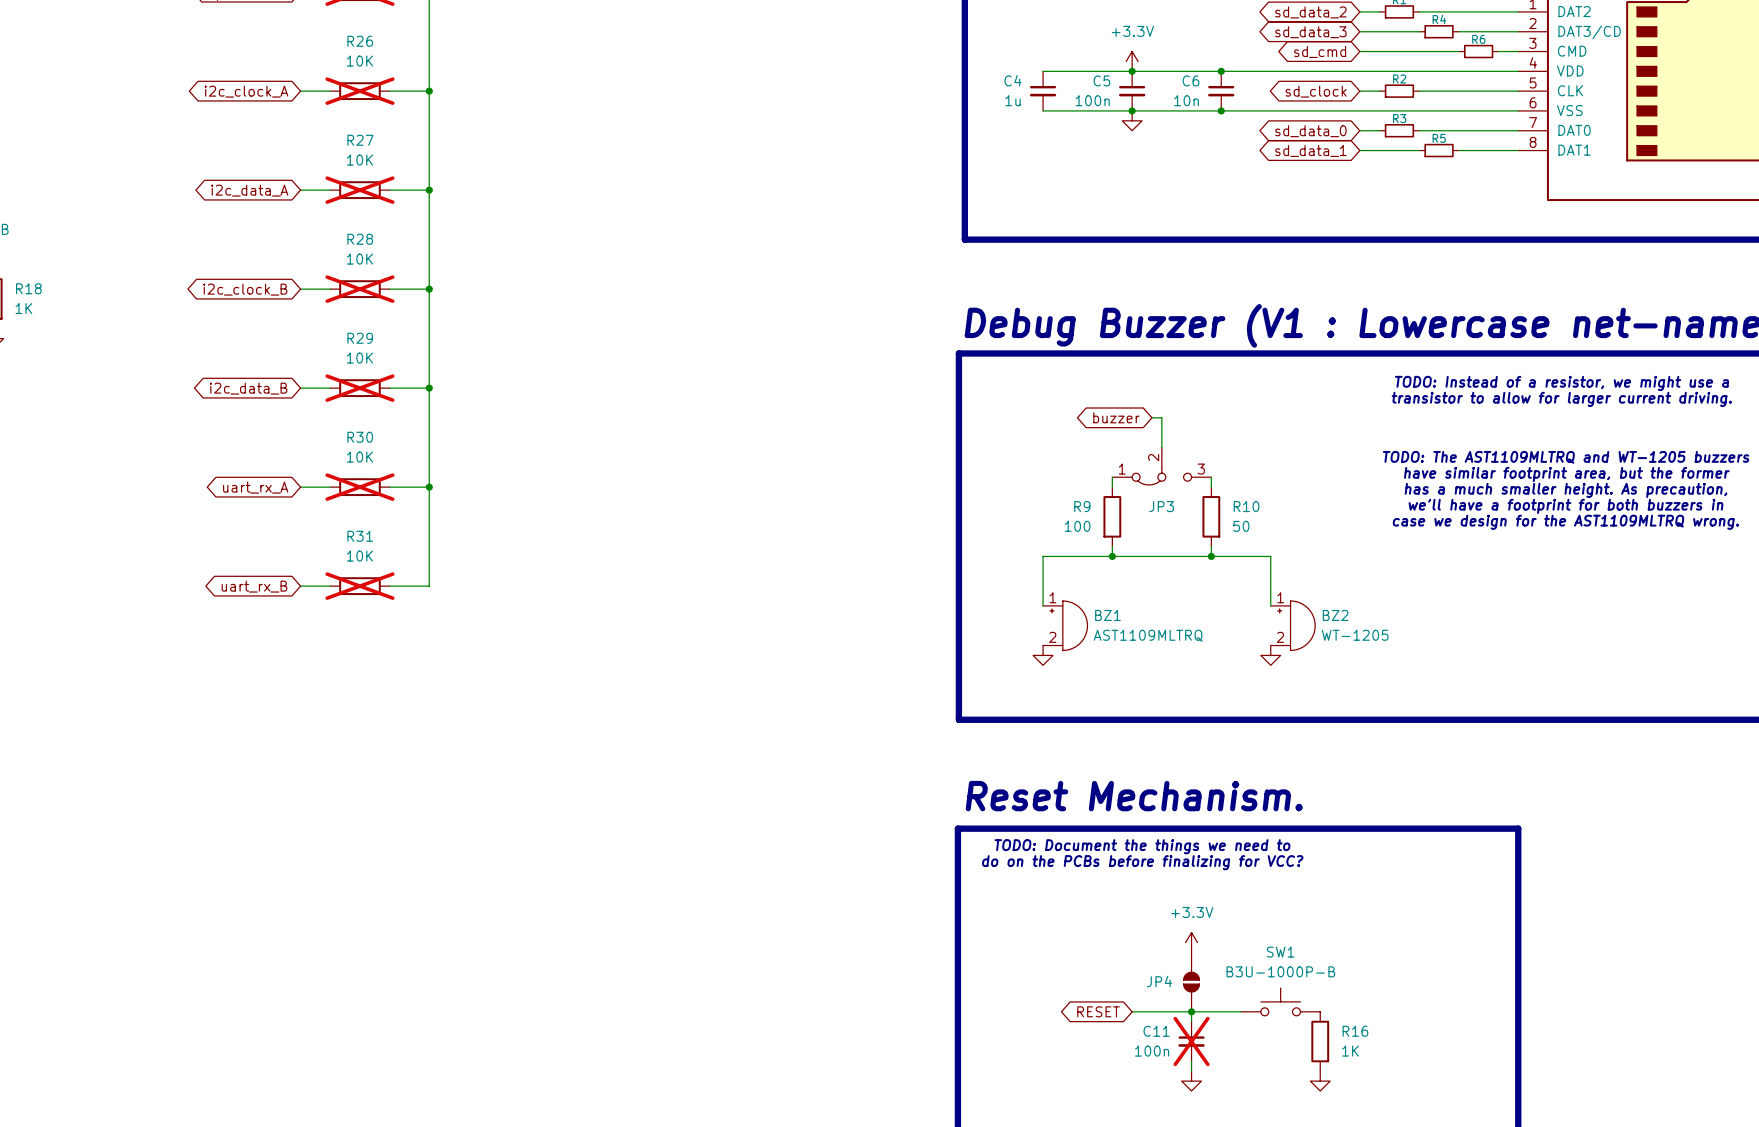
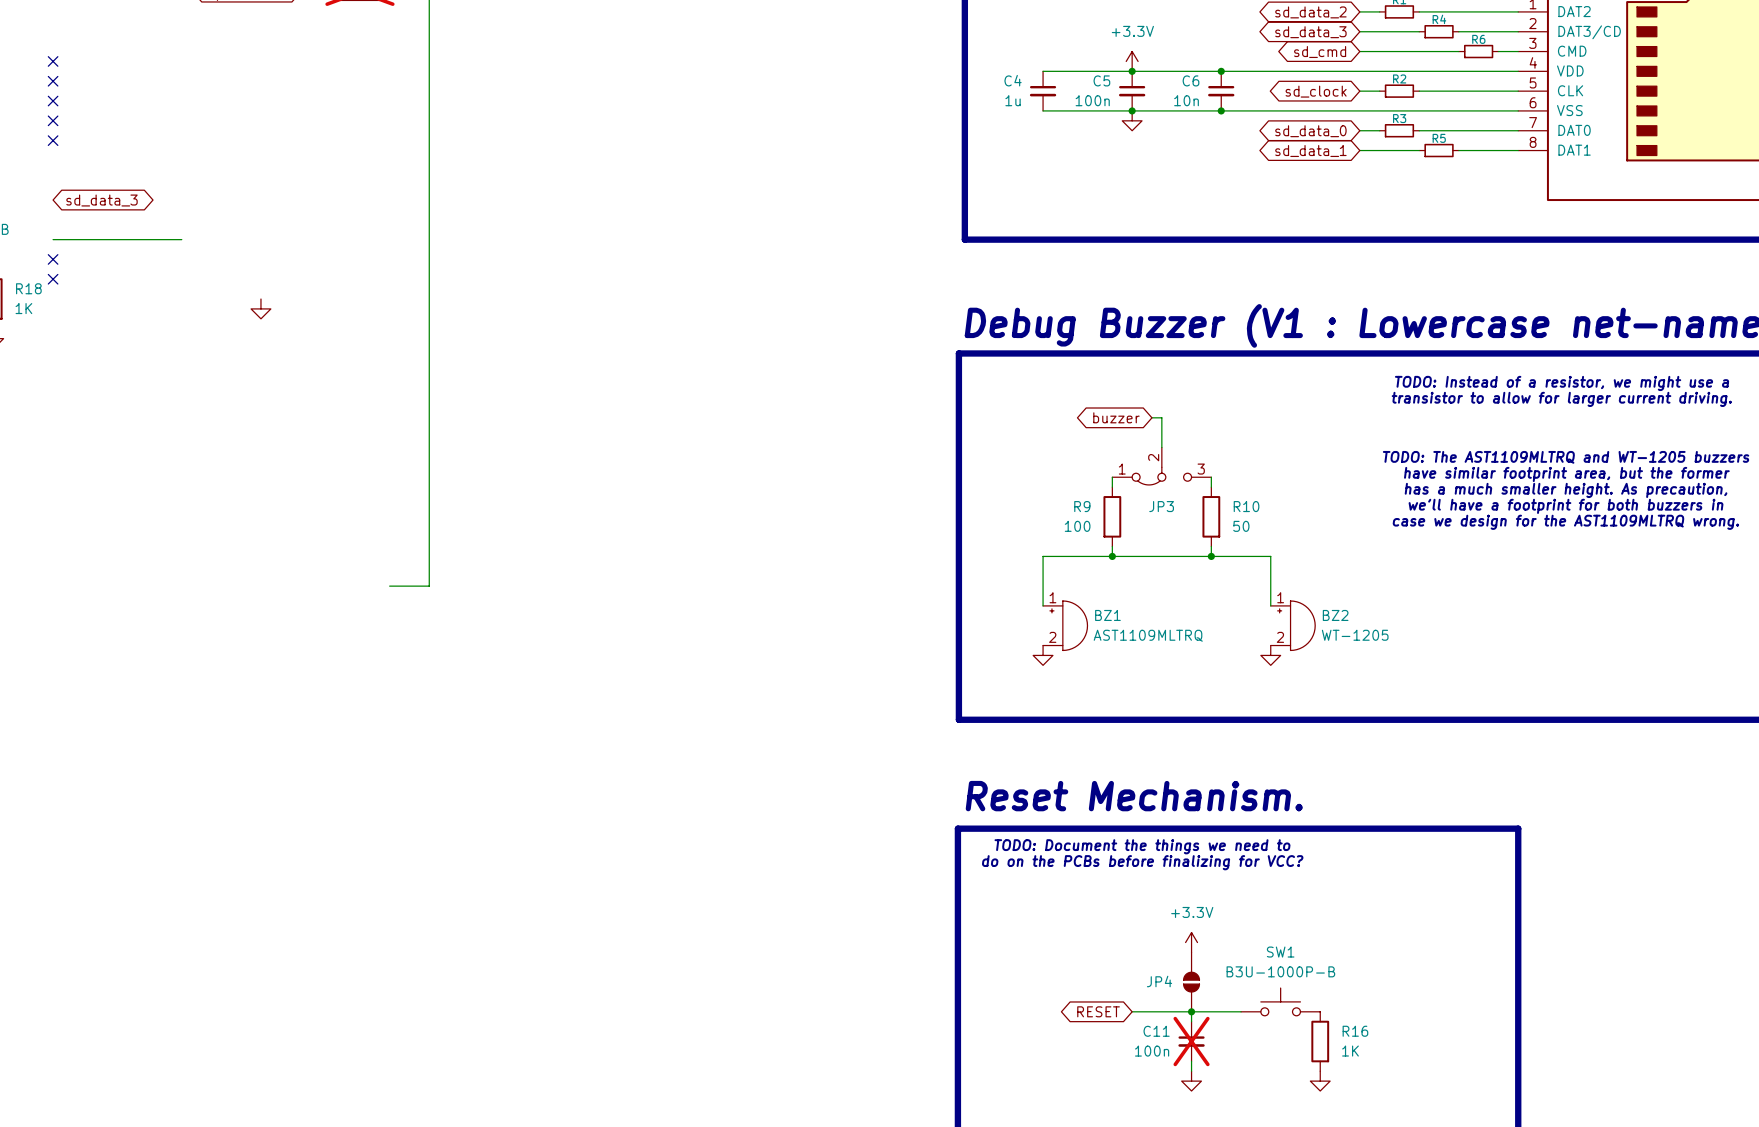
no-connect mark: none -> (53, 61)
no-connect mark: none -> (53, 81)
global label: i2c_clock_A (246, 91) -> none
wire: (300, 91) (330, 91) -> none
R26: 10K (359, 91) -> none
wire: (389, 91) (429, 91) -> none
junction: (429, 91) -> none
no-connect mark: none -> (53, 101)
no-connect mark: none -> (53, 120)
no-connect mark: none -> (53, 140)
global label: i2c_data_A (249, 190) -> none
wire: (300, 190) (330, 190) -> none
R27: 10K (359, 190) -> none
wire: (389, 190) (429, 190) -> none
junction: (429, 190) -> none
global label: none -> sd_data_3 (102, 200)
wire: none -> (53, 239) (181, 239)
no-connect mark: none -> (53, 259)
no-connect mark: none -> (53, 279)
global label: i2c_clock_B (245, 289) -> none
wire: (300, 289) (330, 289) -> none
R28: 10K (359, 289) -> none
wire: (389, 289) (429, 289) -> none
junction: (429, 289) -> none
power symbol: none -> (260, 308)
global label: i2c_data_B (248, 388) -> none
wire: (300, 388) (330, 388) -> none
R29: 10K (359, 388) -> none
wire: (389, 388) (429, 388) -> none
junction: (429, 388) -> none
global label: uart_rx_A (255, 487) -> none
wire: (300, 487) (330, 487) -> none
R30: 10K (359, 487) -> none
wire: (389, 487) (429, 487) -> none
junction: (429, 487) -> none
global label: uart_rx_B (254, 586) -> none
wire: (300, 586) (330, 586) -> none
R31: 10K (359, 586) -> none

